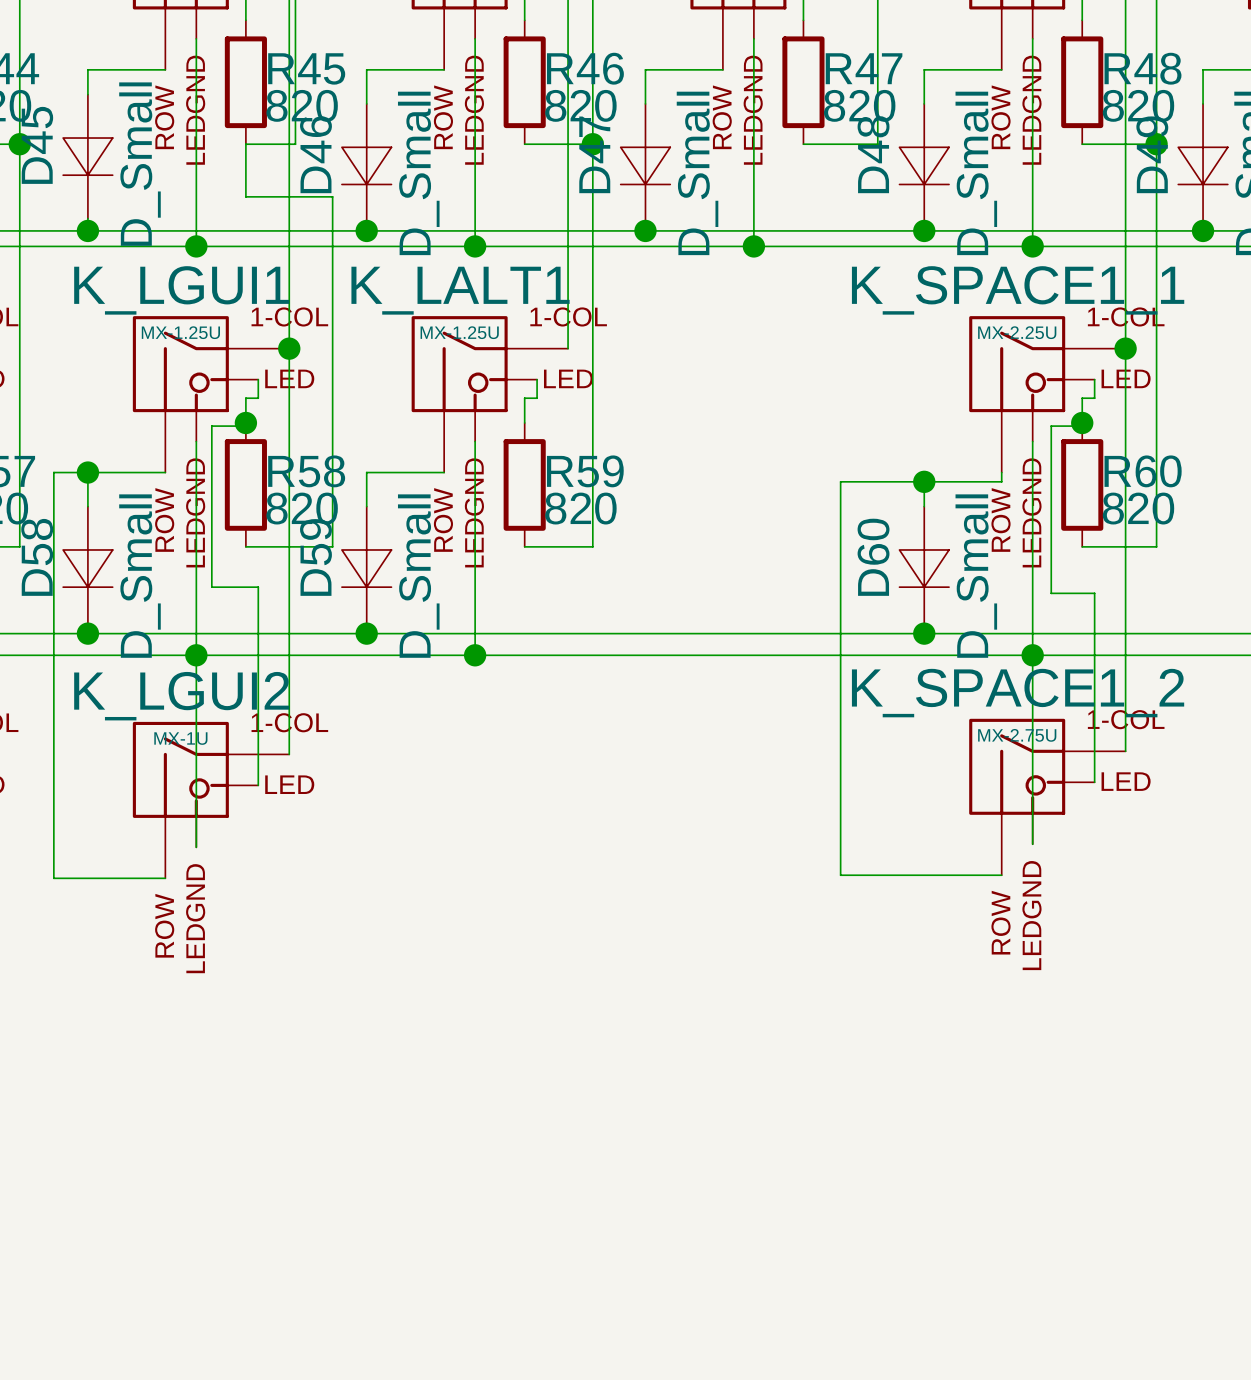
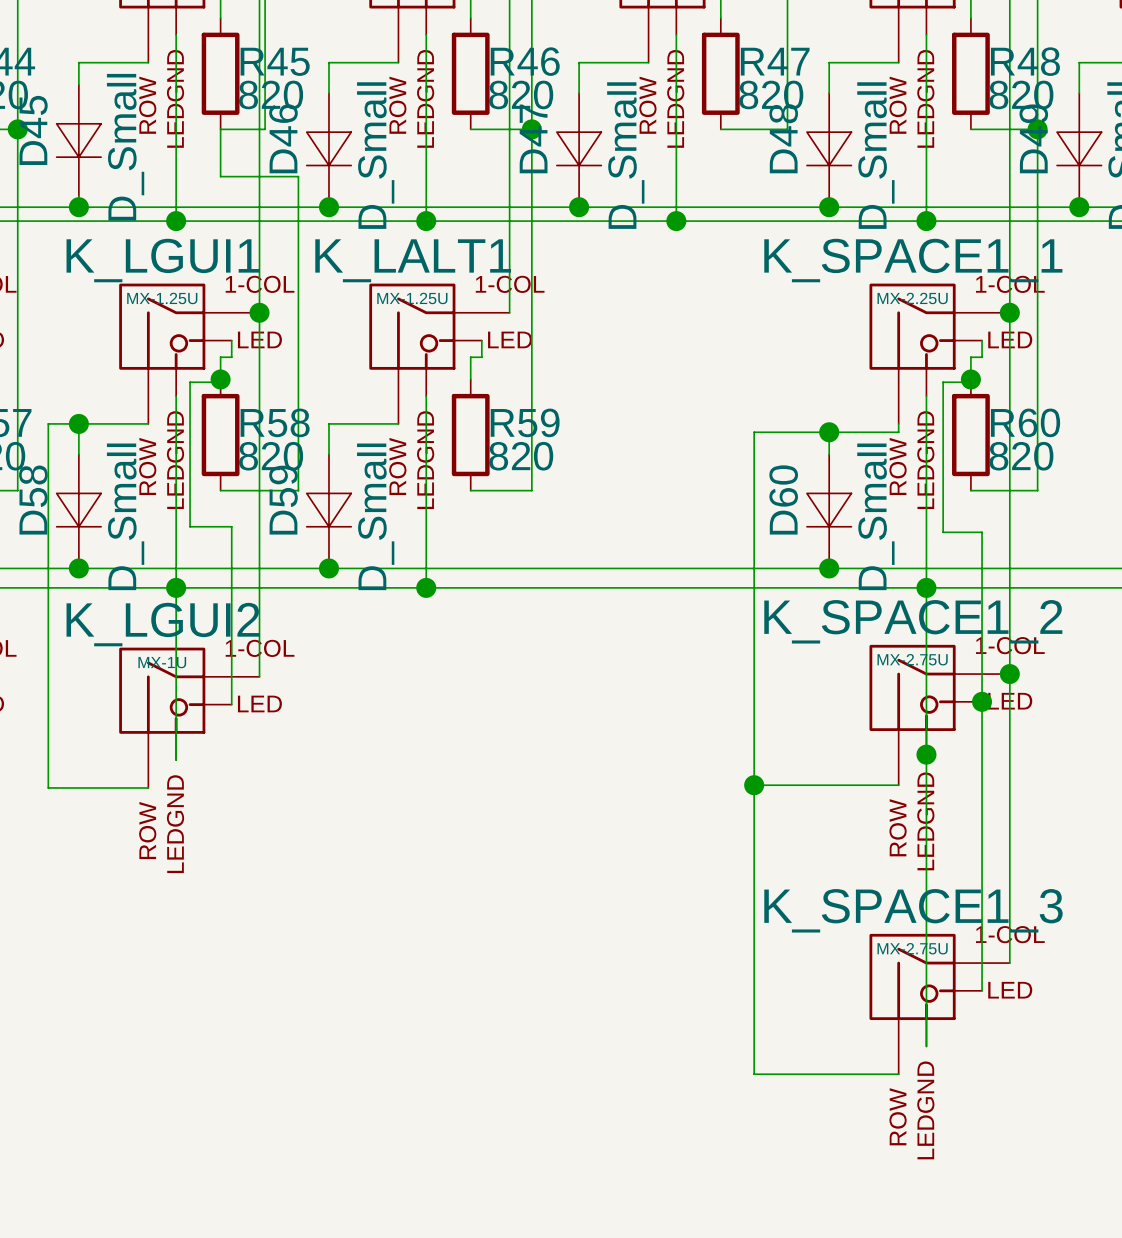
wire: none -> (1009, 674) (1009, 963)
junction: none -> (1009, 674)
wire: none -> (982, 701) (982, 990)
junction: none -> (982, 701)
wire: none -> (926, 754) (926, 1046)
junction: none -> (926, 754)
wire: none -> (754, 785) (754, 1074) (898, 1074)
junction: none -> (754, 785)
K_SPACE1_3: none -> MX-2.75U (939, 1004)

